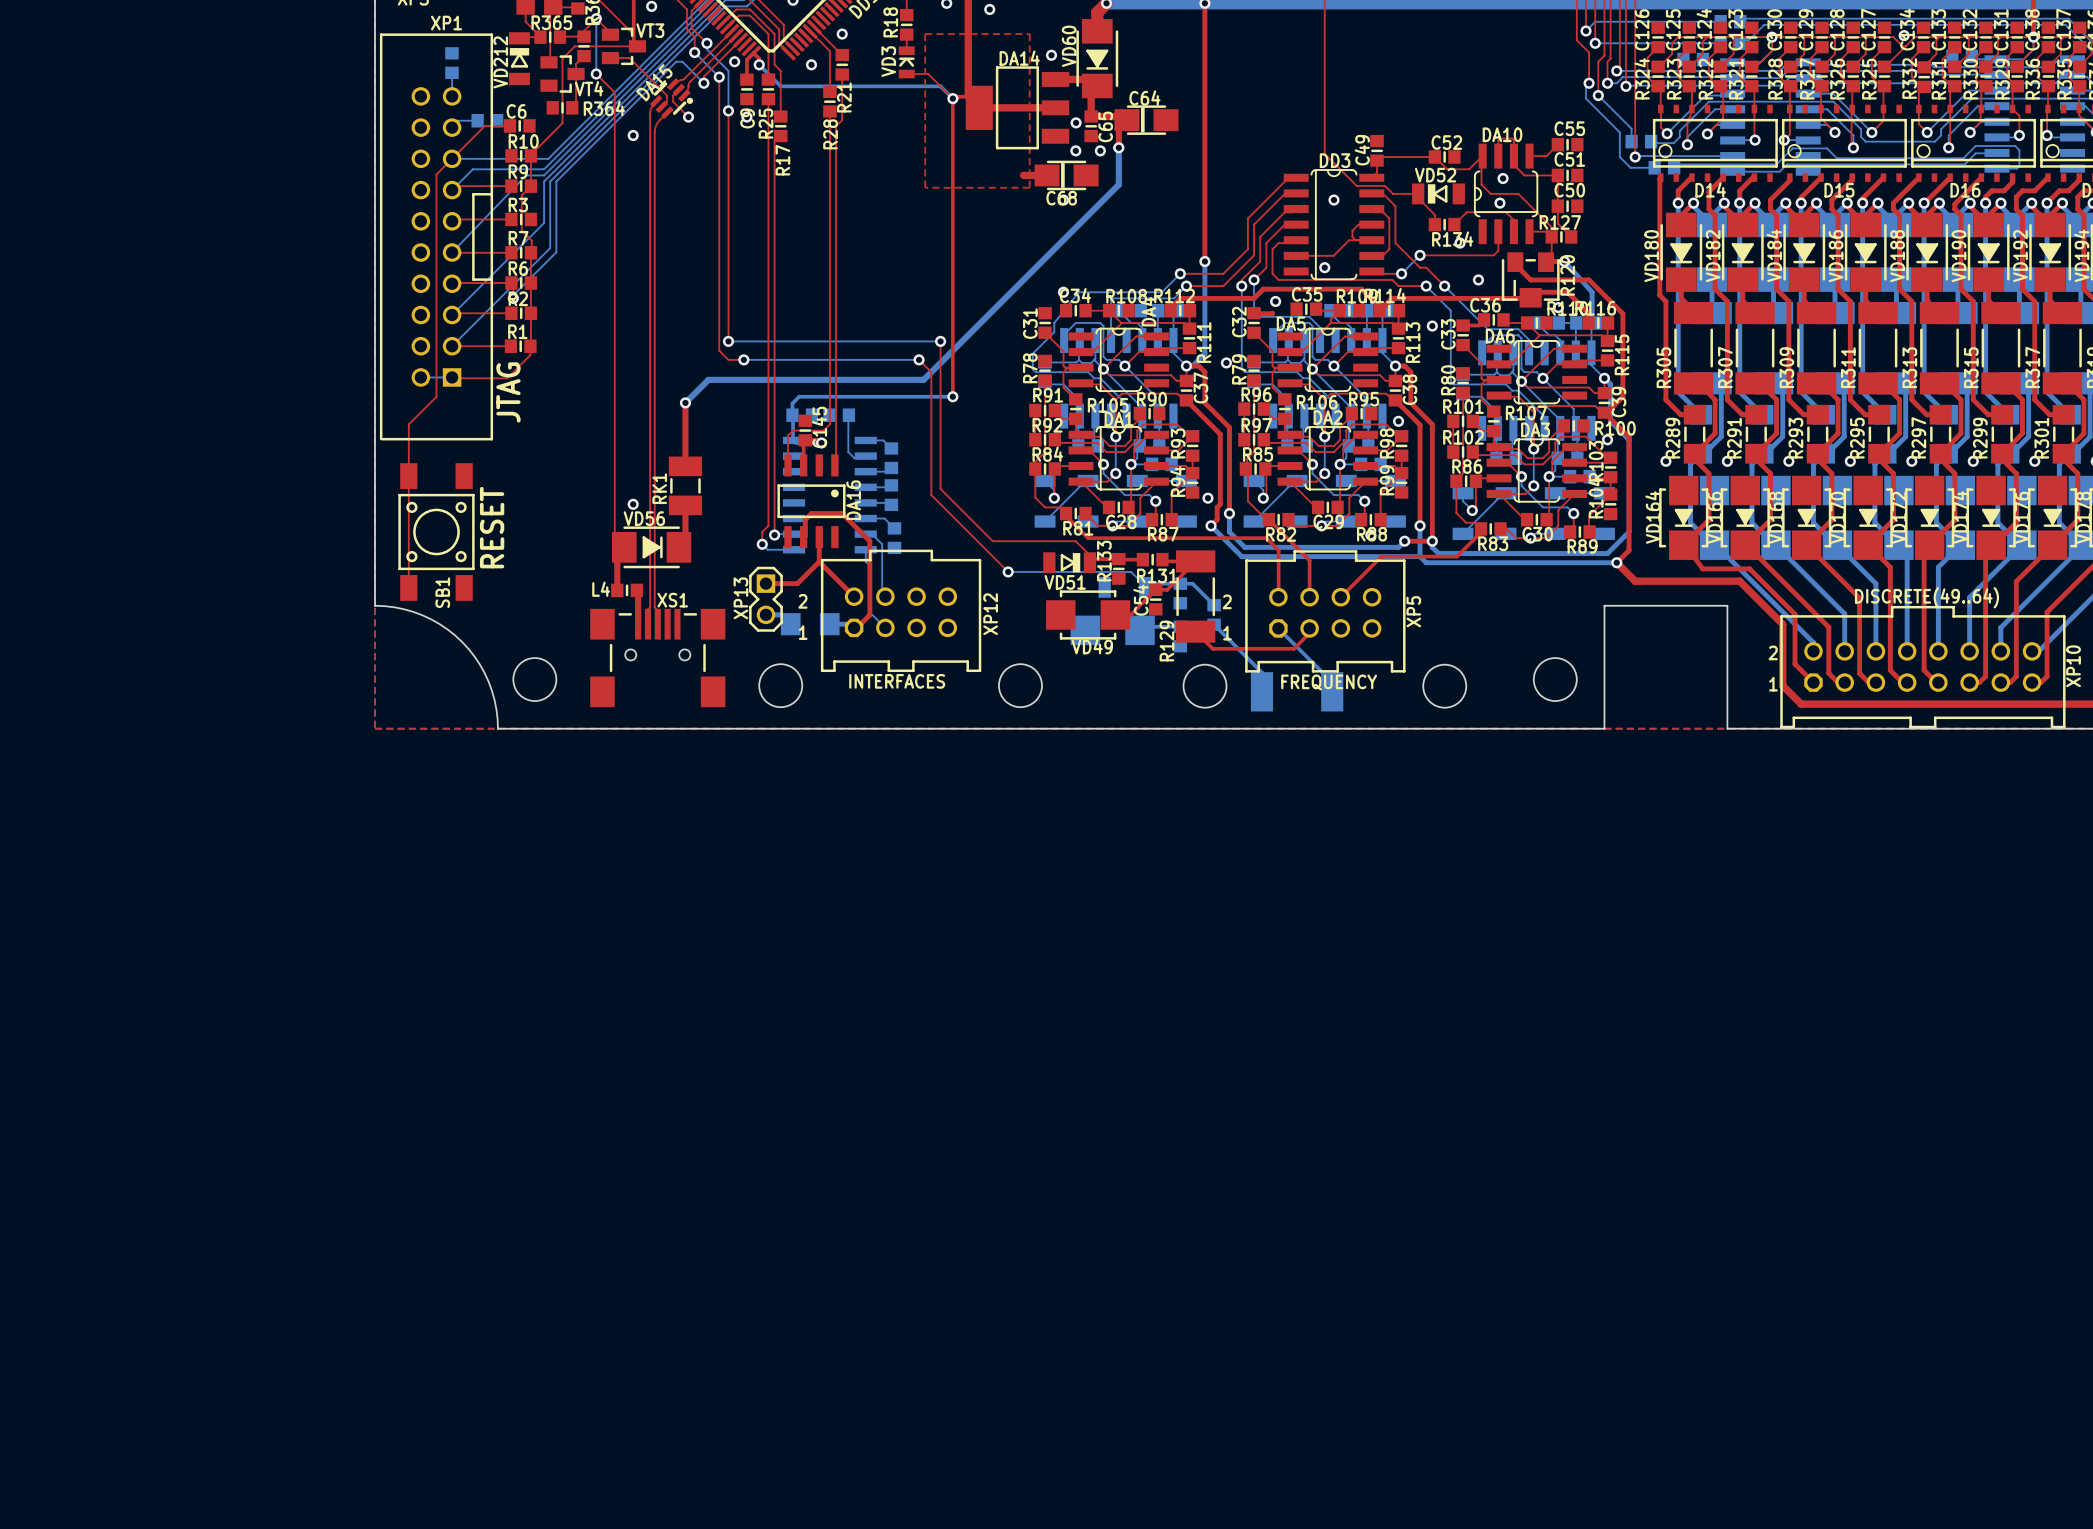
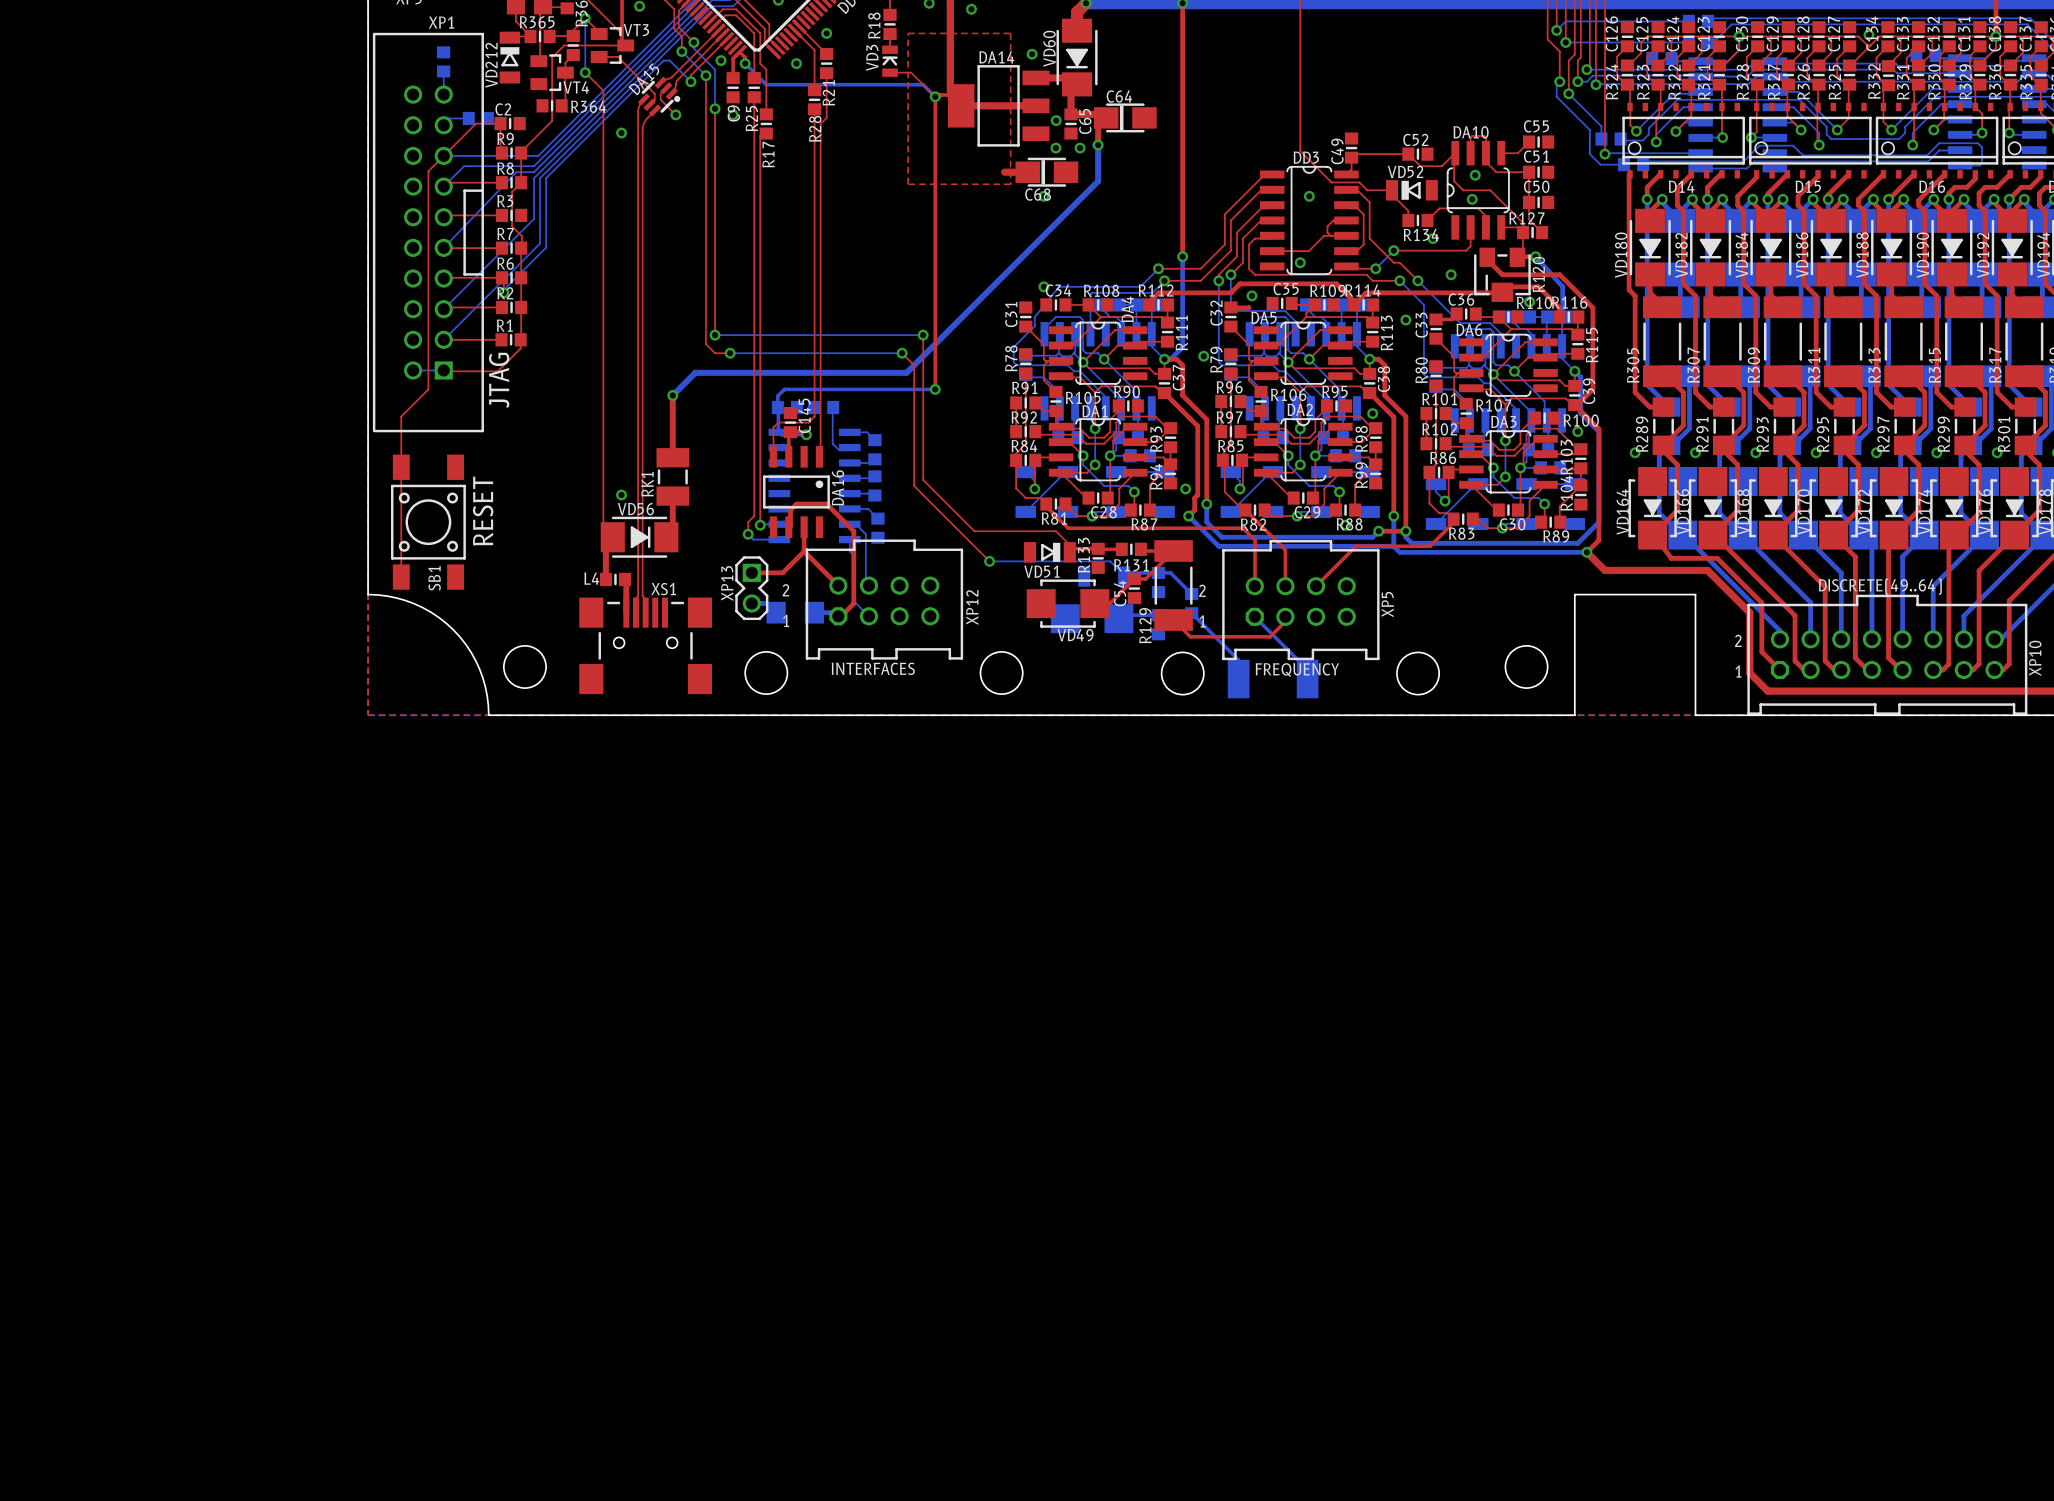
C6 name: C6 (516, 111) -> C2 (503, 109)
R10 name: R10 (523, 141) -> R9 (505, 138)
R9 name: R9 (518, 171) -> R8 (505, 168)

